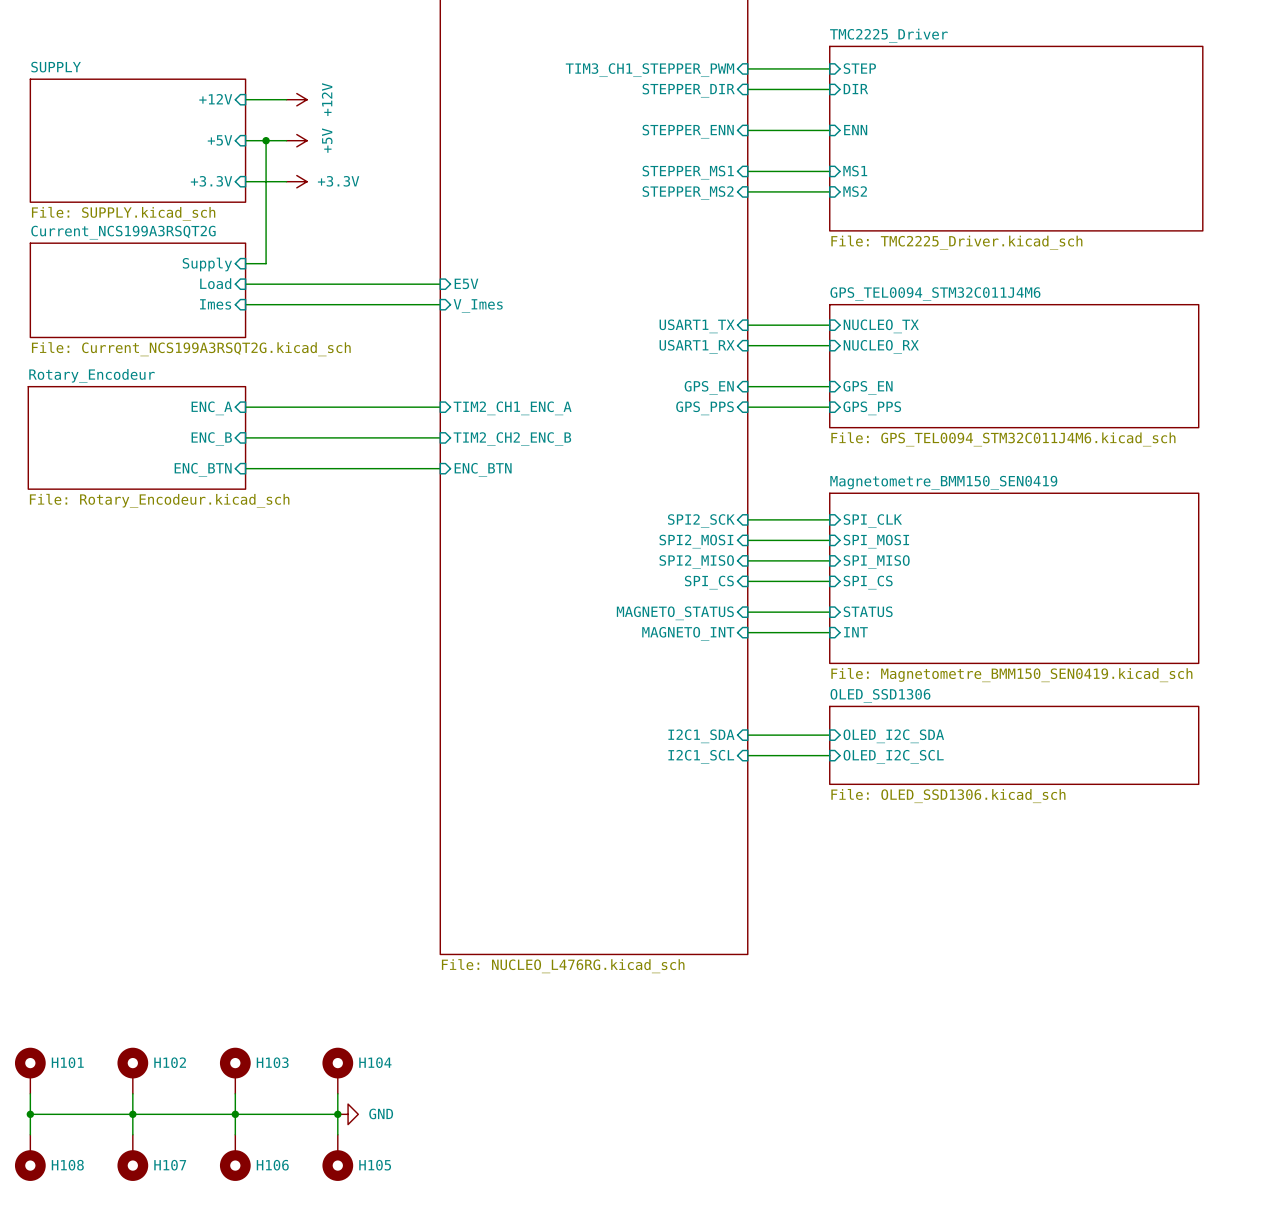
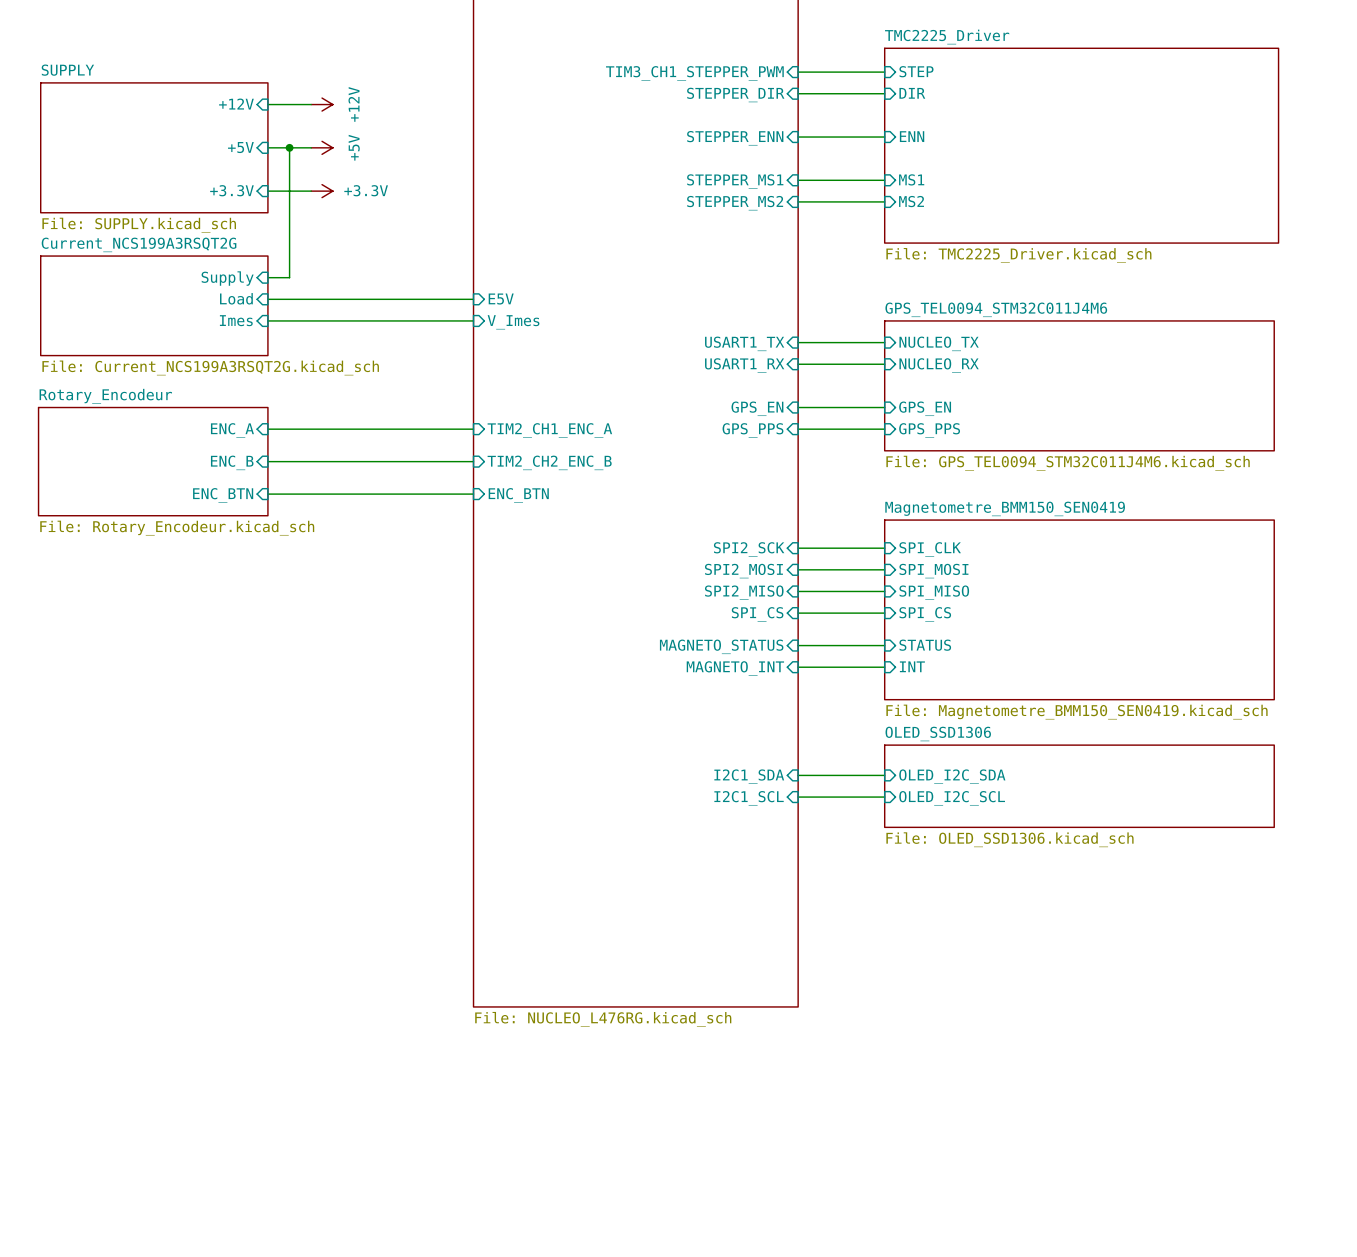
H101: (30, 1070) -> none
H102: (132, 1070) -> none
H103: (235, 1070) -> none
H104: (337, 1070) -> none
wire: (30, 1093) (30, 1134) -> none
wire: (132, 1093) (132, 1134) -> none
wire: (235, 1093) (235, 1134) -> none
wire: (337, 1093) (337, 1134) -> none
wire: (30, 1114) (337, 1114) -> none
junction: (30, 1114) -> none
junction: (132, 1114) -> none
junction: (235, 1114) -> none
junction: (337, 1114) -> none
power symbol: GND (348, 1114) -> none
H108: (30, 1157) -> none
H107: (132, 1157) -> none
H106: (235, 1157) -> none
H105: (337, 1157) -> none

